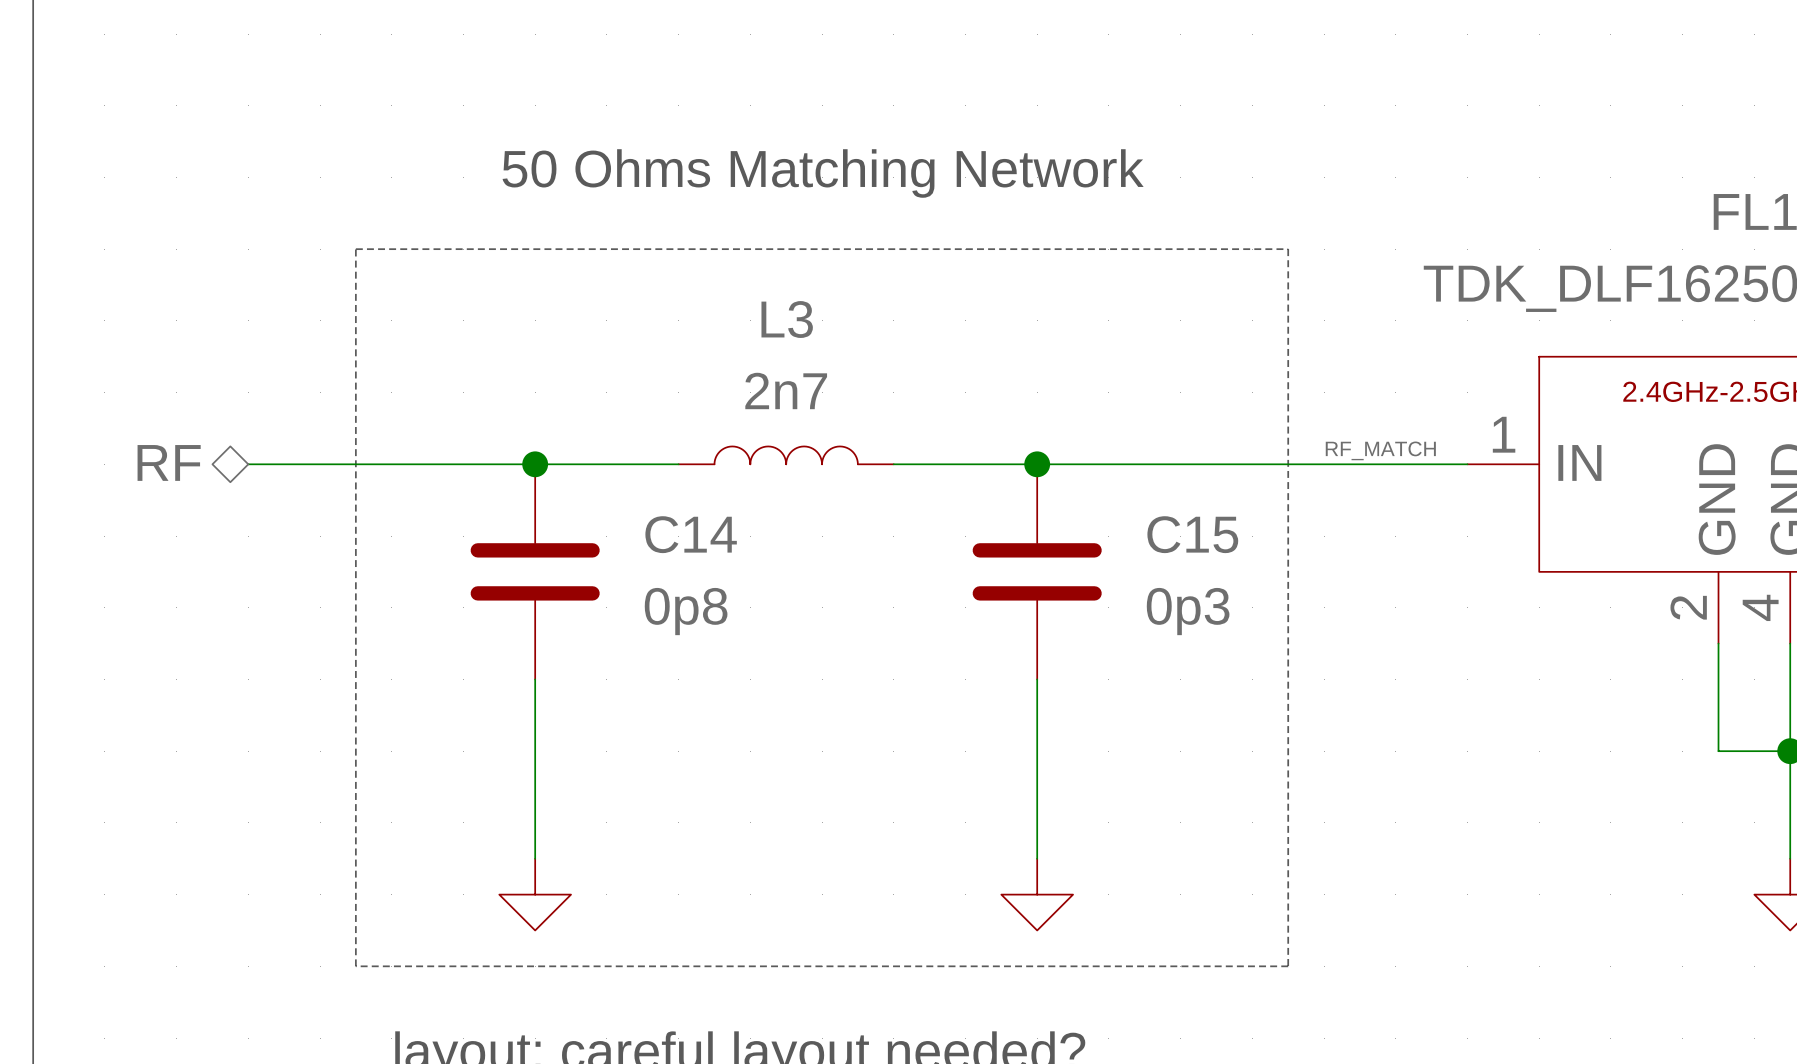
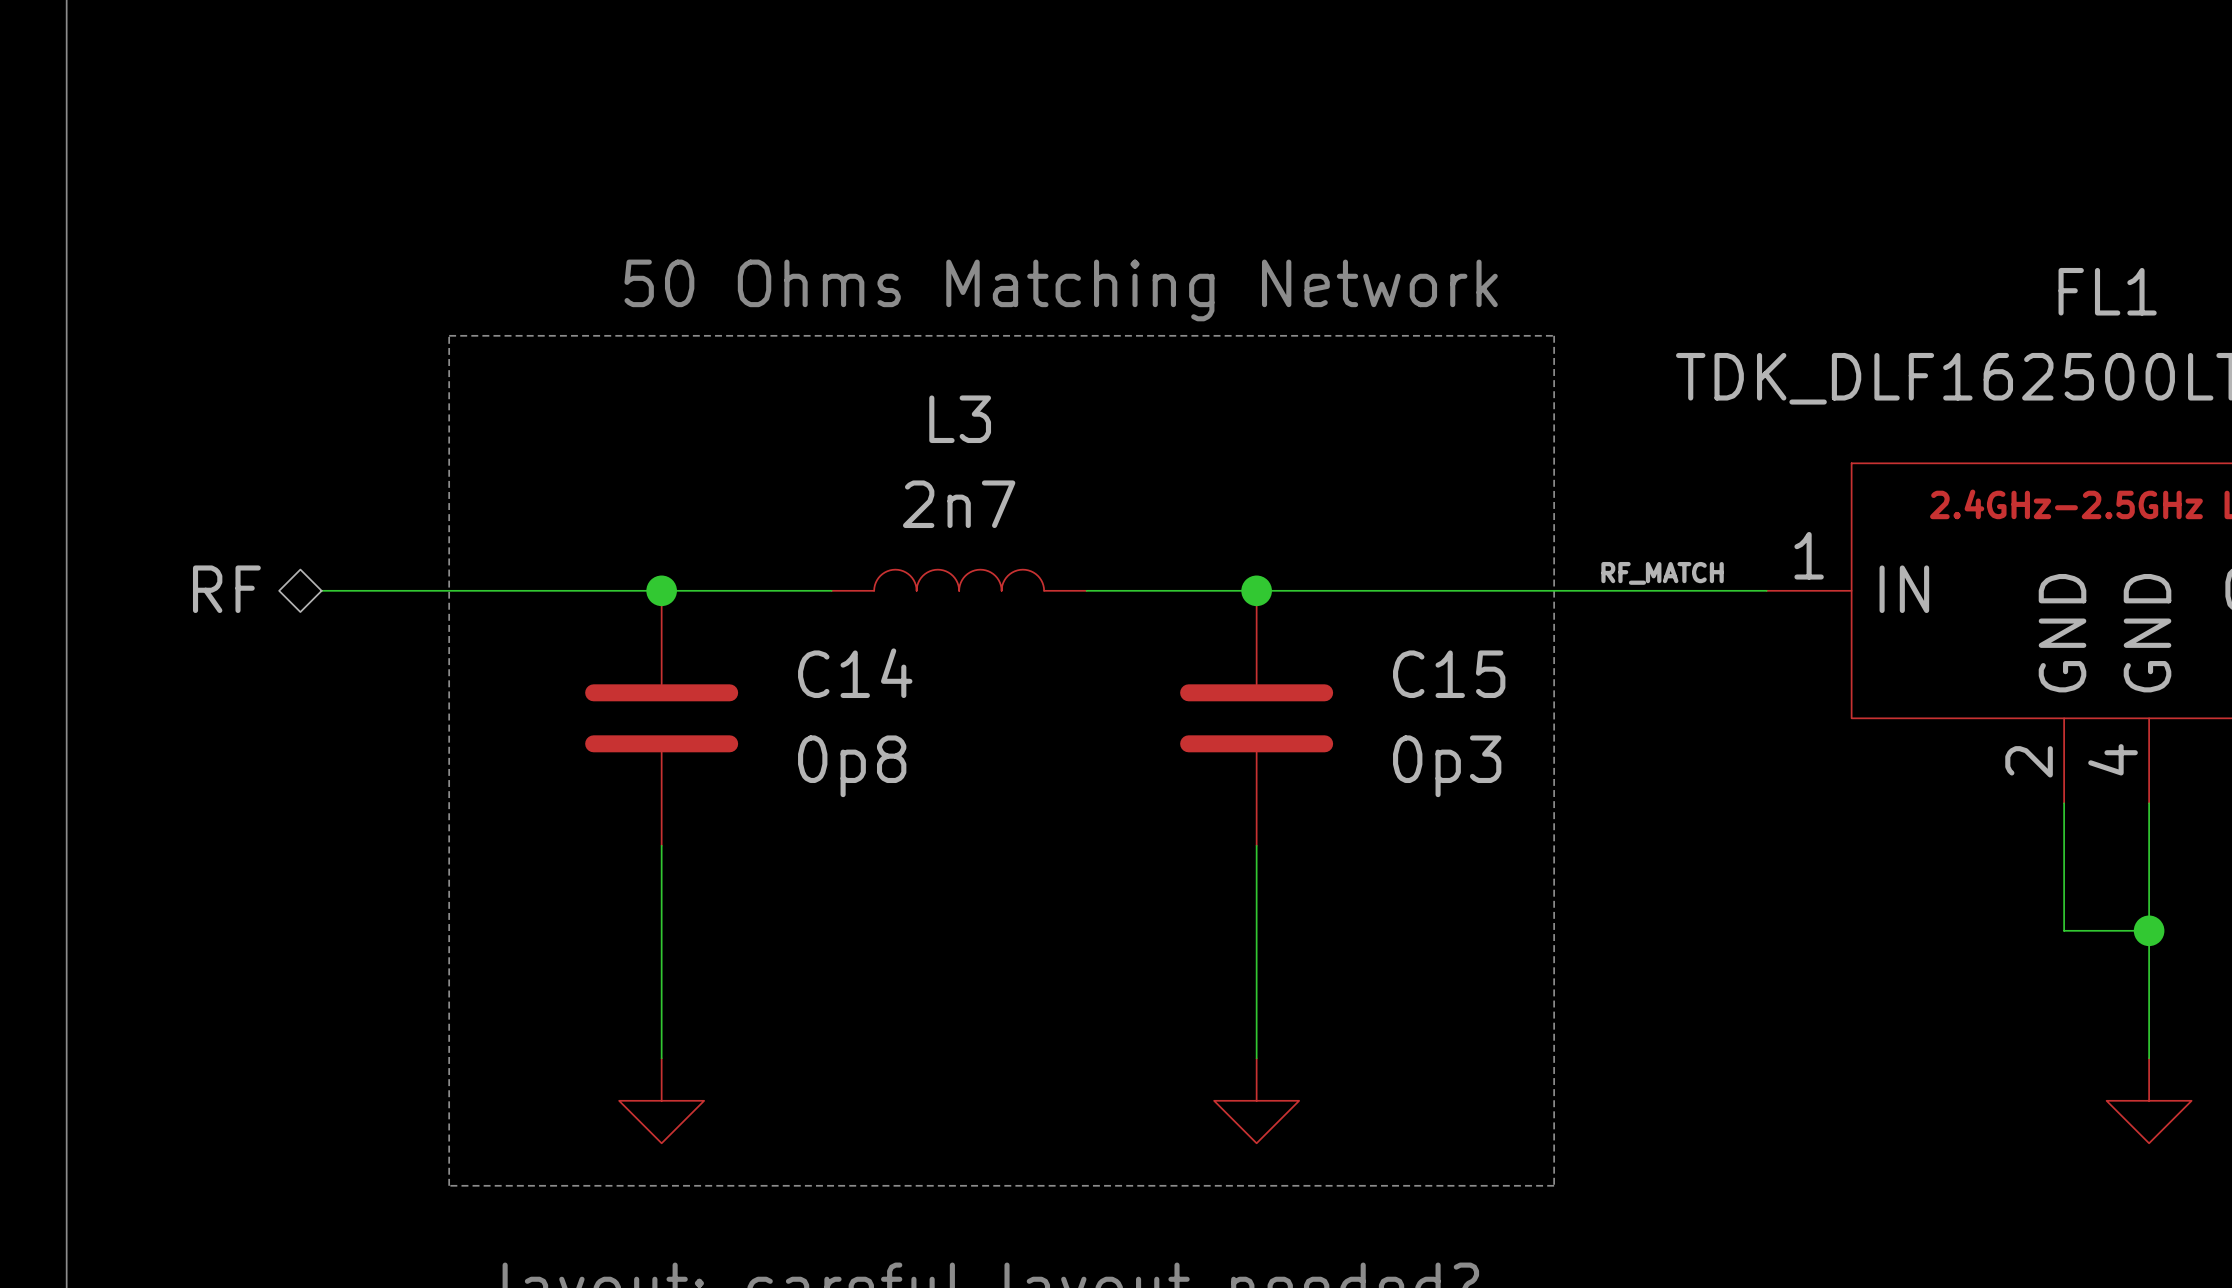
text position: 50 Ohms Matching Network (823, 173) -> 50 Ohms Matching Network (1061, 290)

